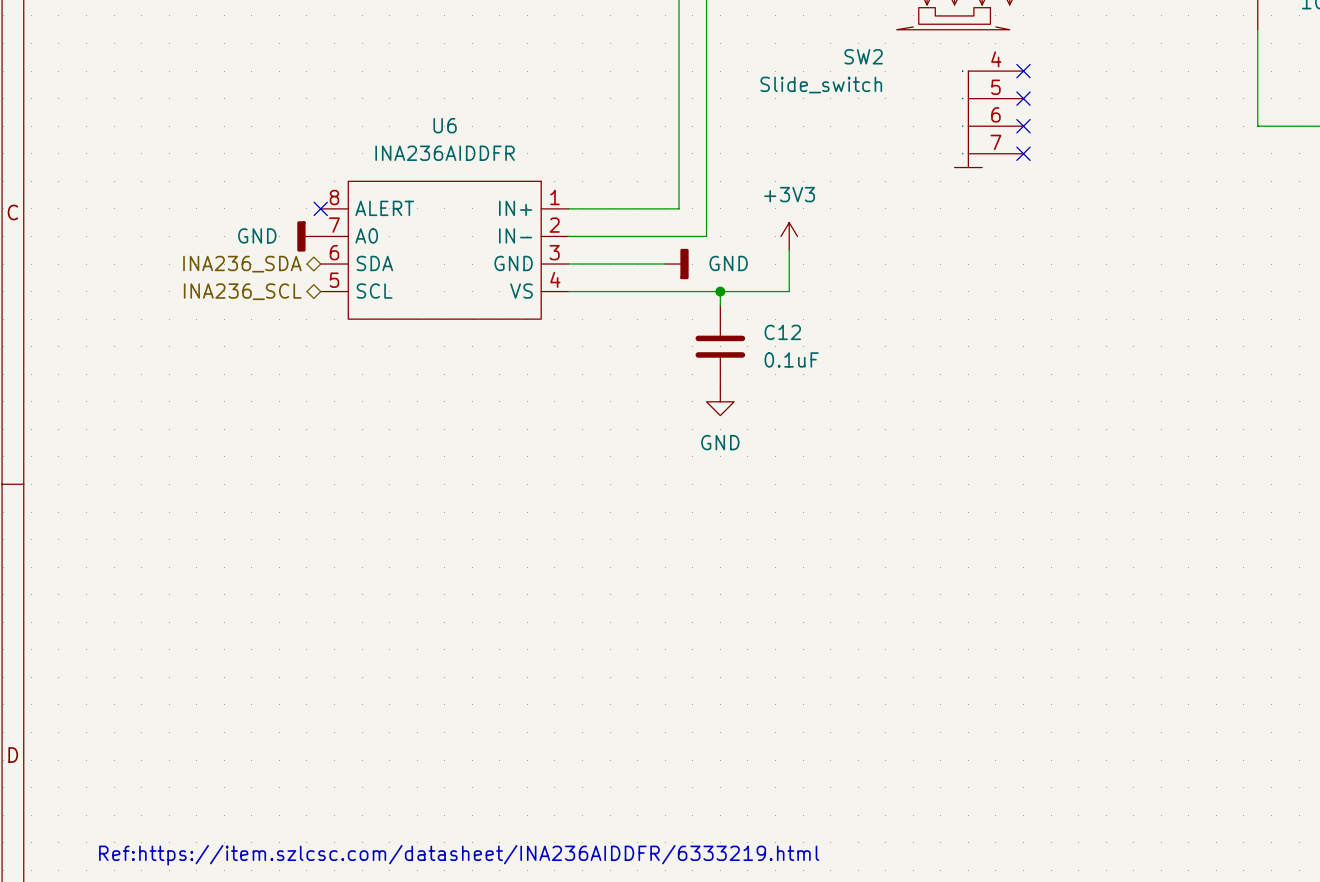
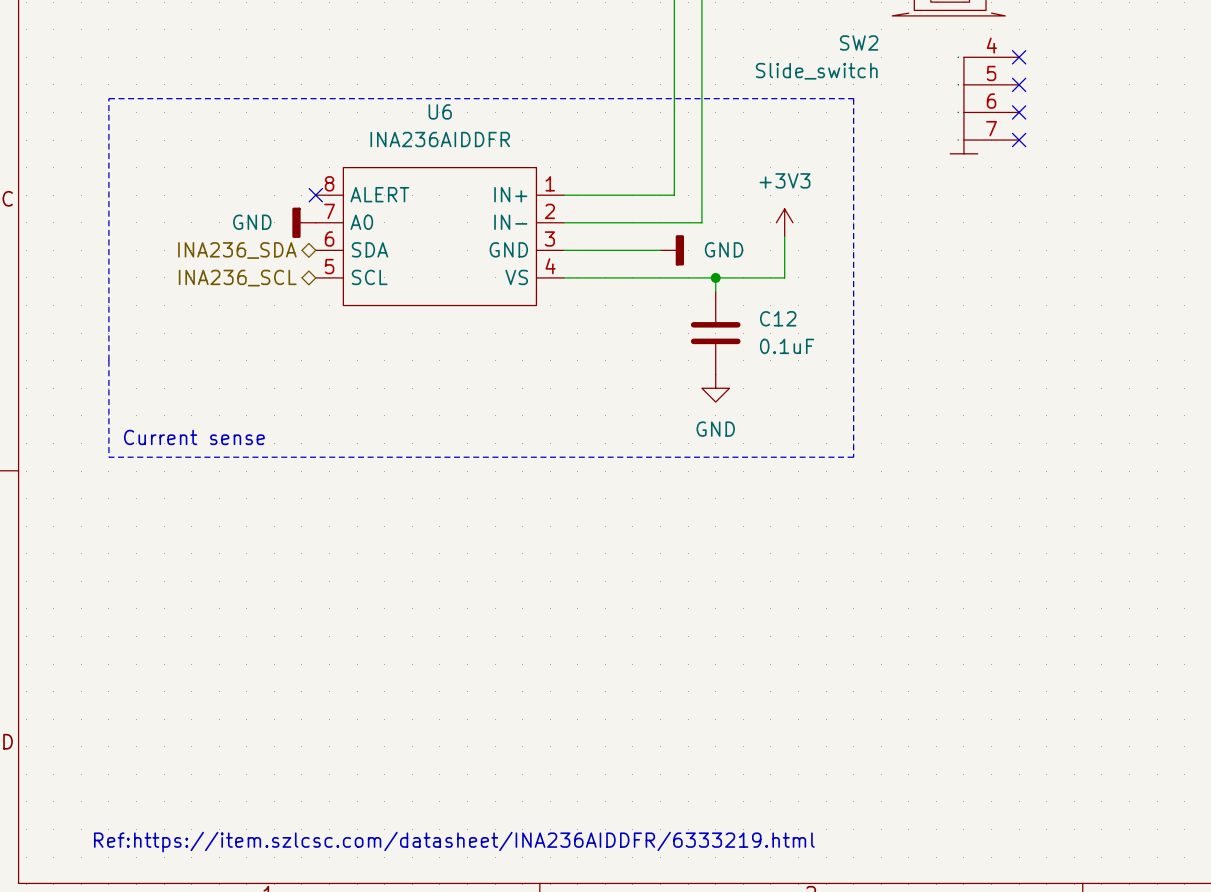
line: none -> (108, 98) (108, 457) (853, 457) (853, 98) (108, 98)
text: none -> Current sense (194, 437)

